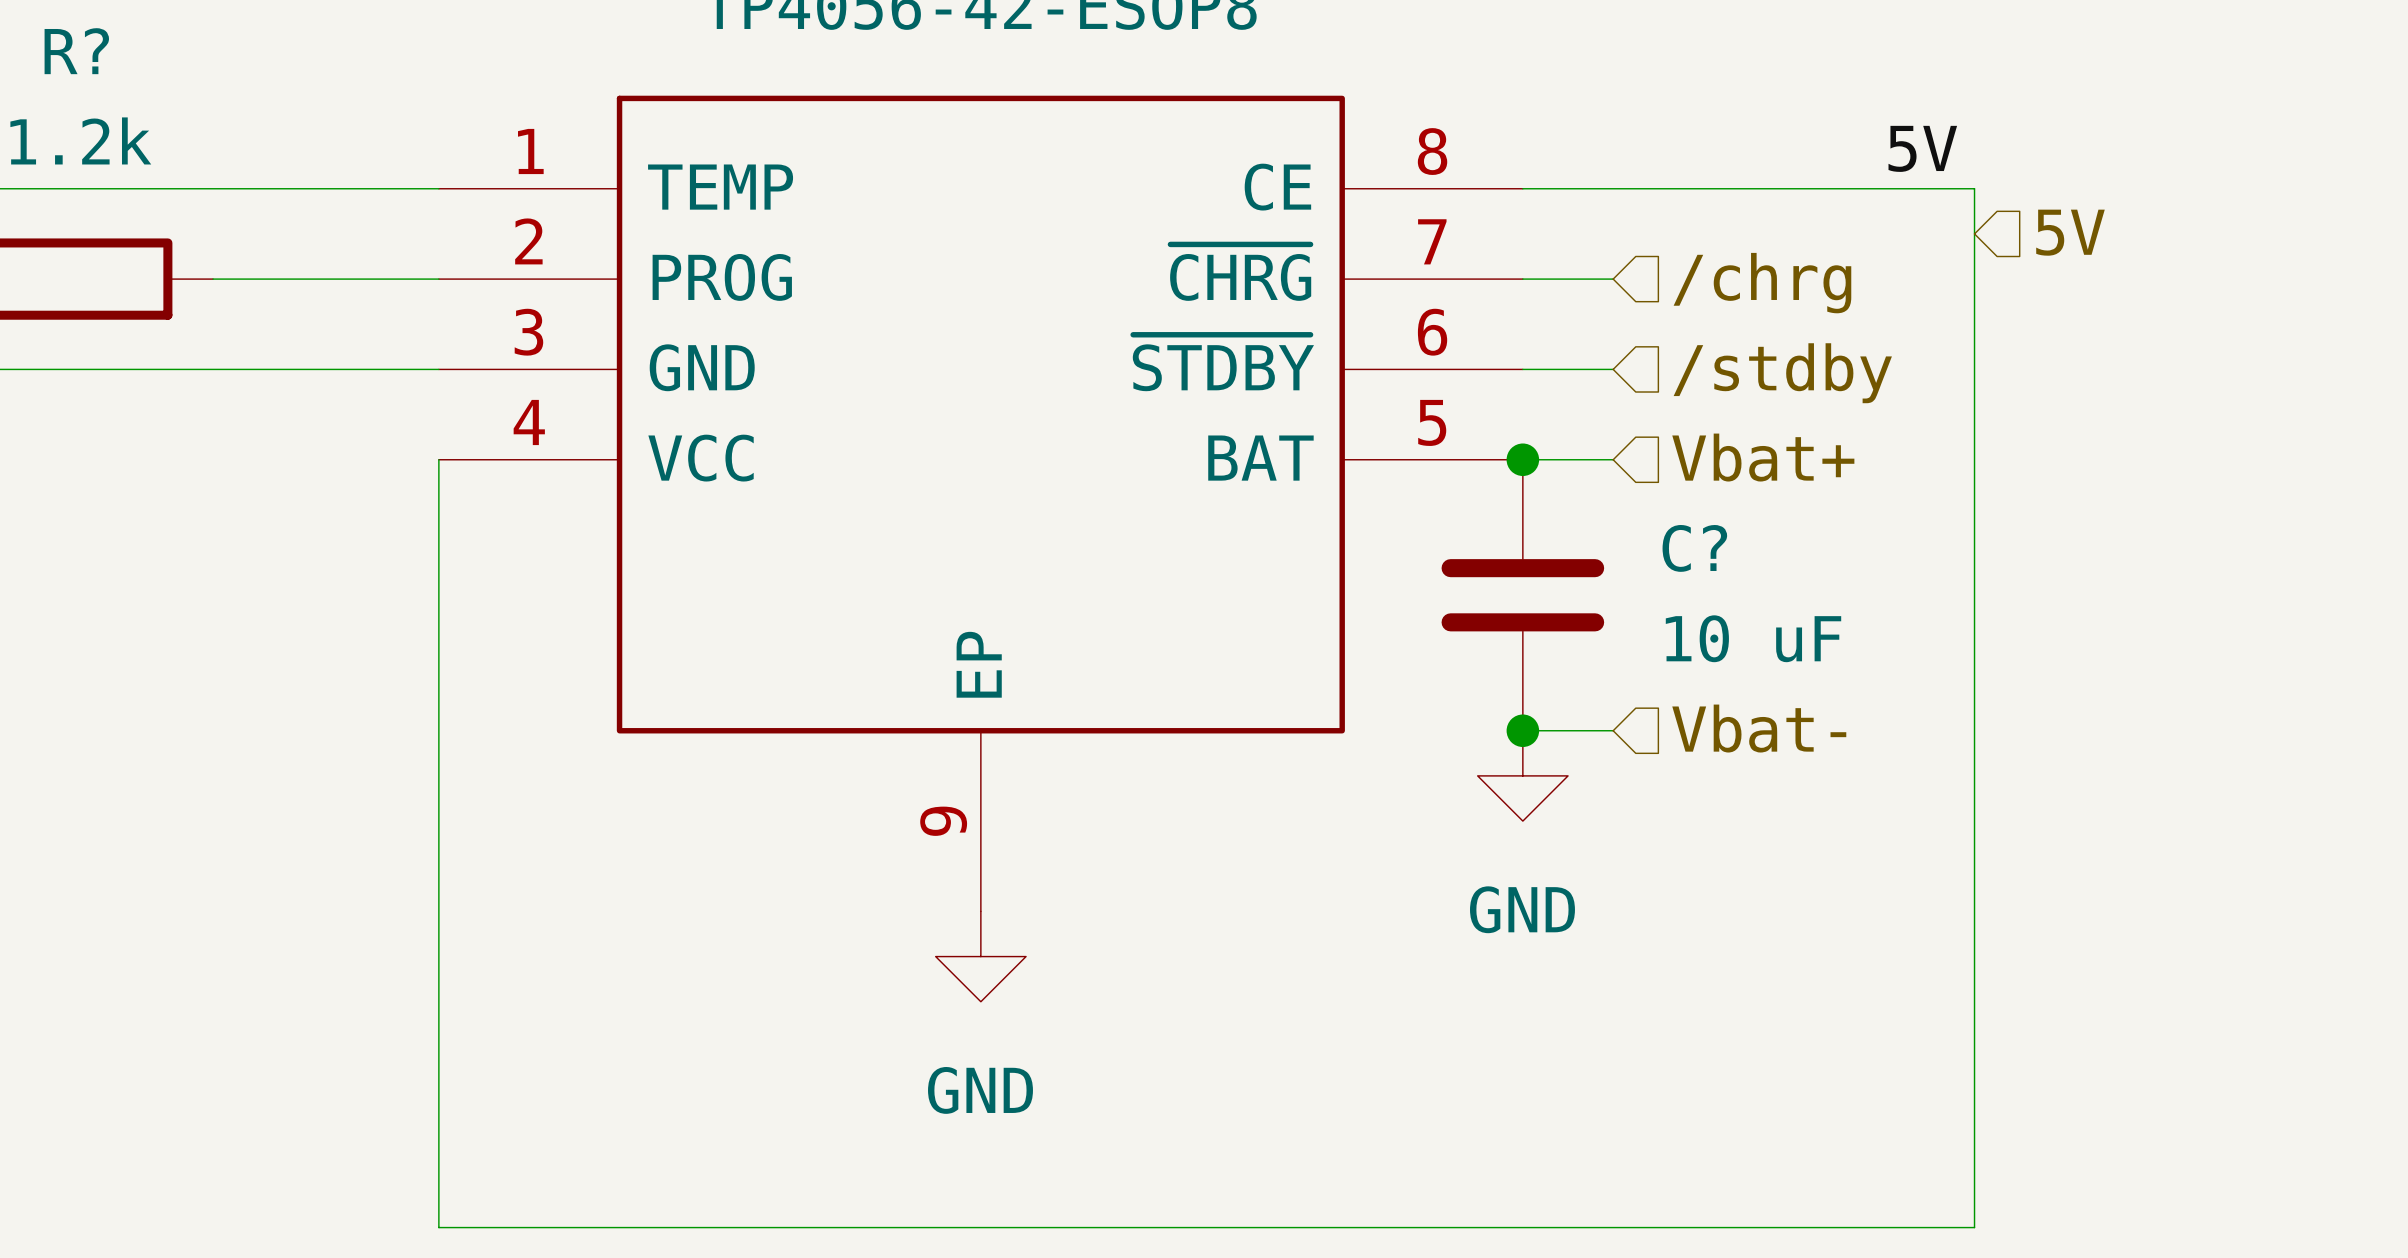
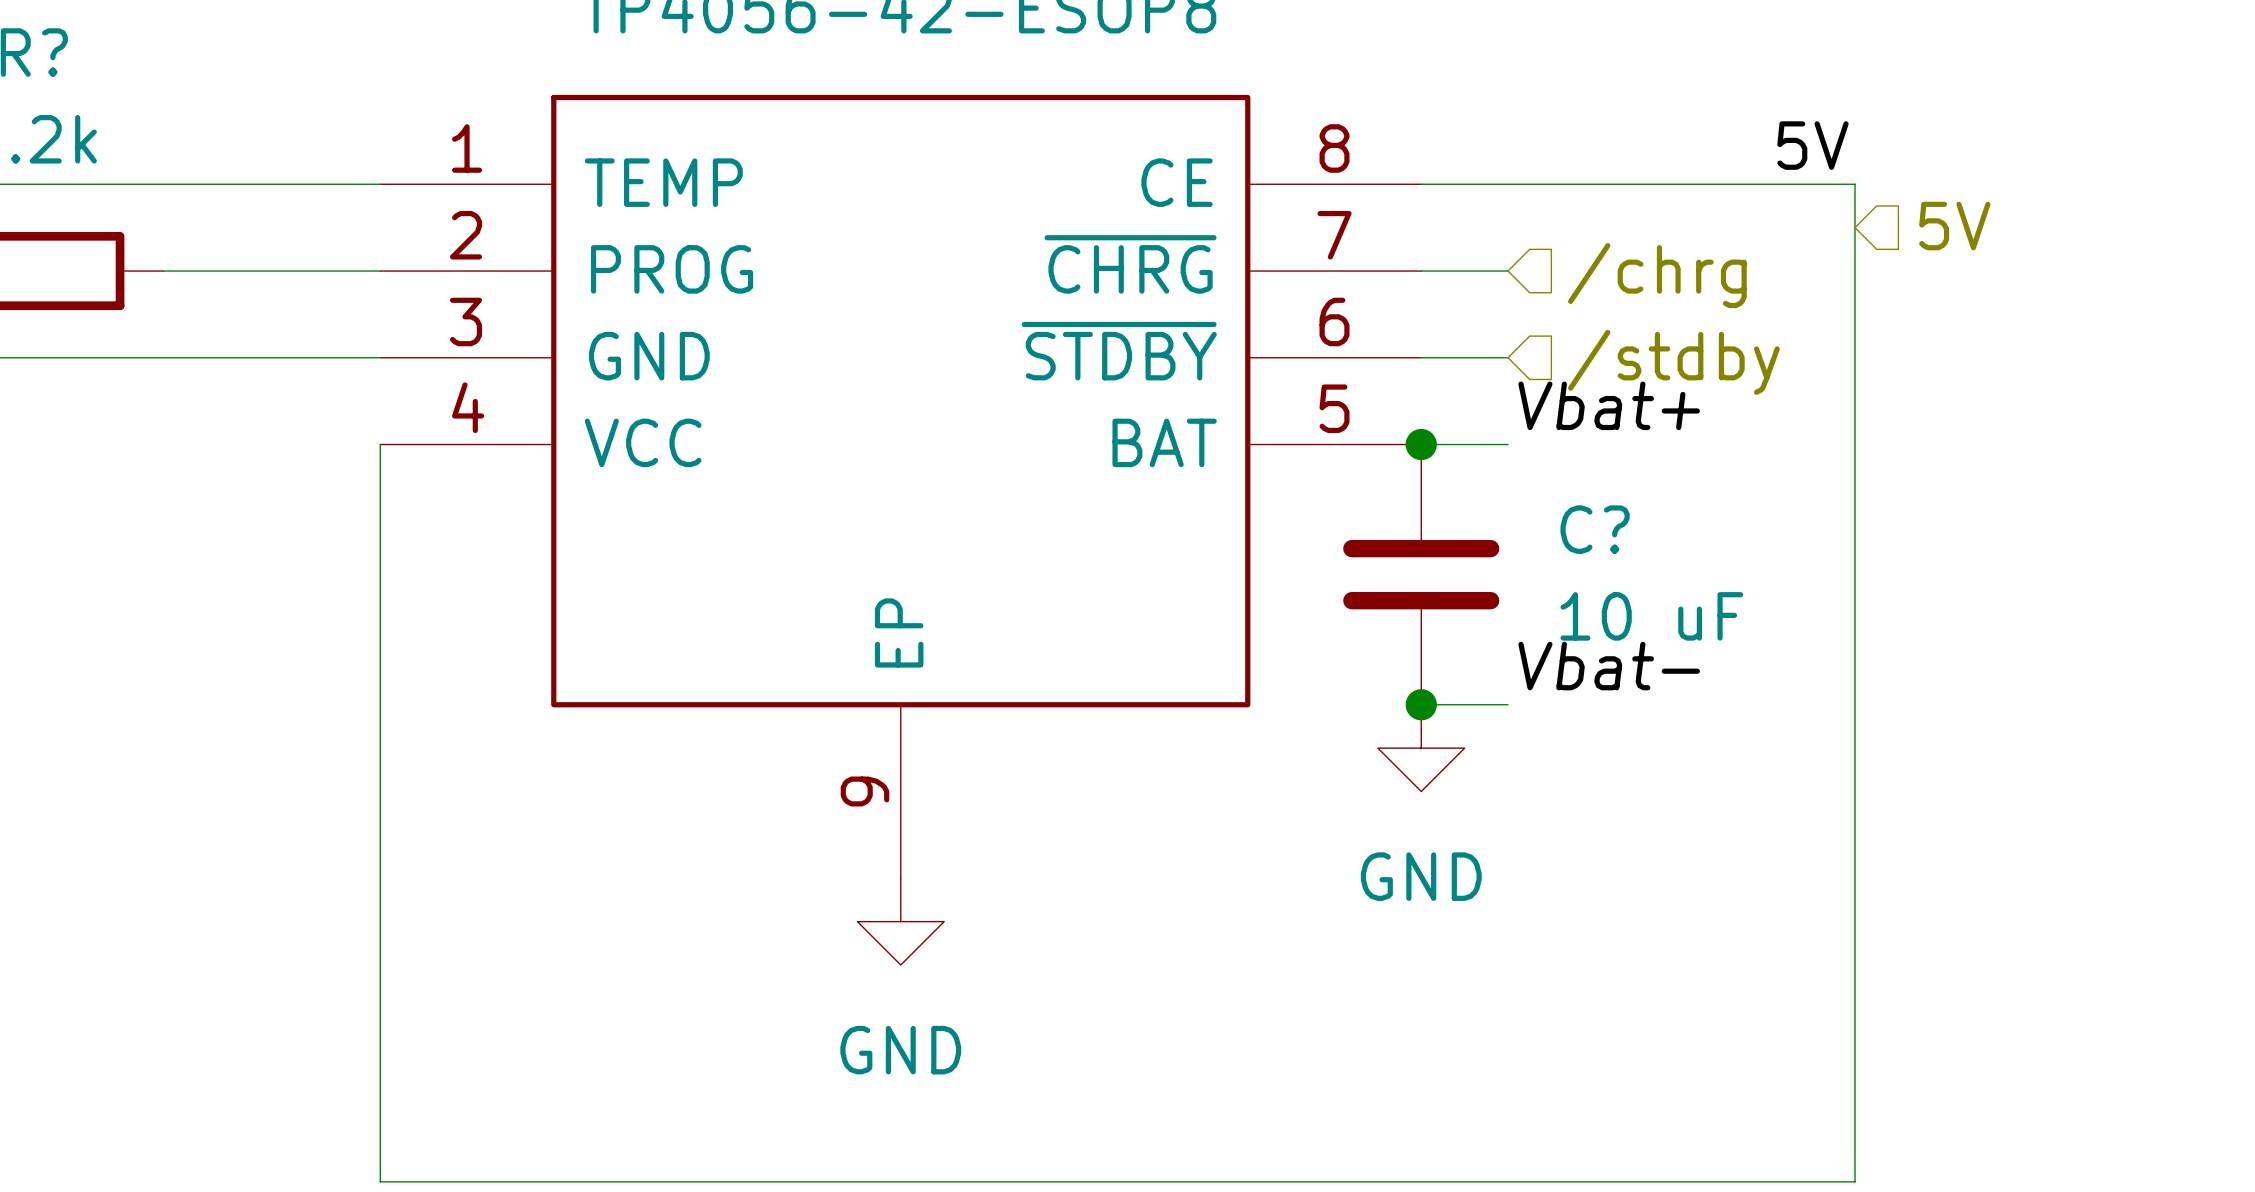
label: none -> Vbat+ (1609, 405)
hierarchical label: Vbat+ (1763, 457) -> none
label: none -> Vbat- (1609, 666)
hierarchical label: Vbat- (1759, 728) -> none

